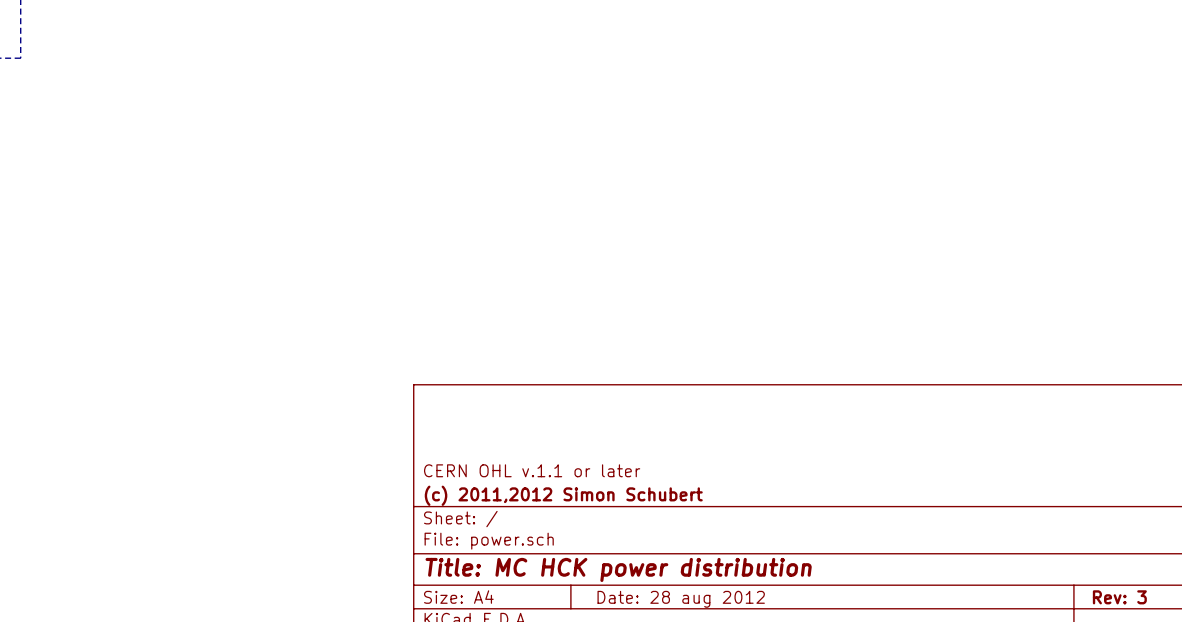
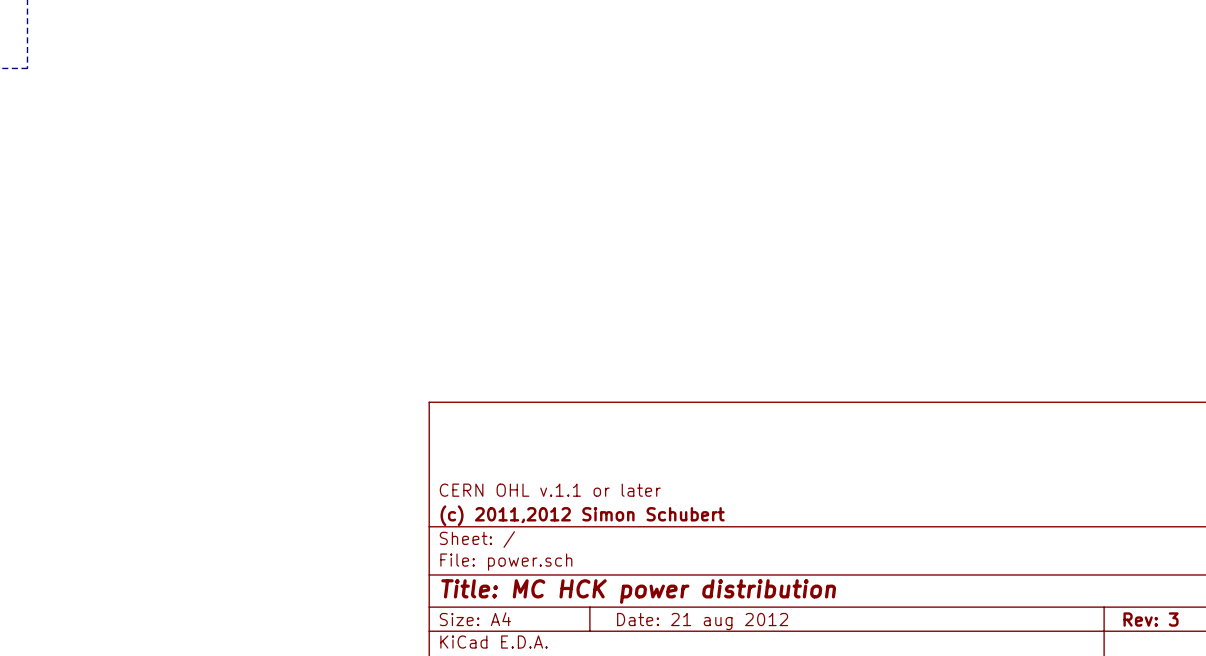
title block: Date: 28 aug 2012 (681, 599) -> Date: 21 aug 2012 (702, 621)

